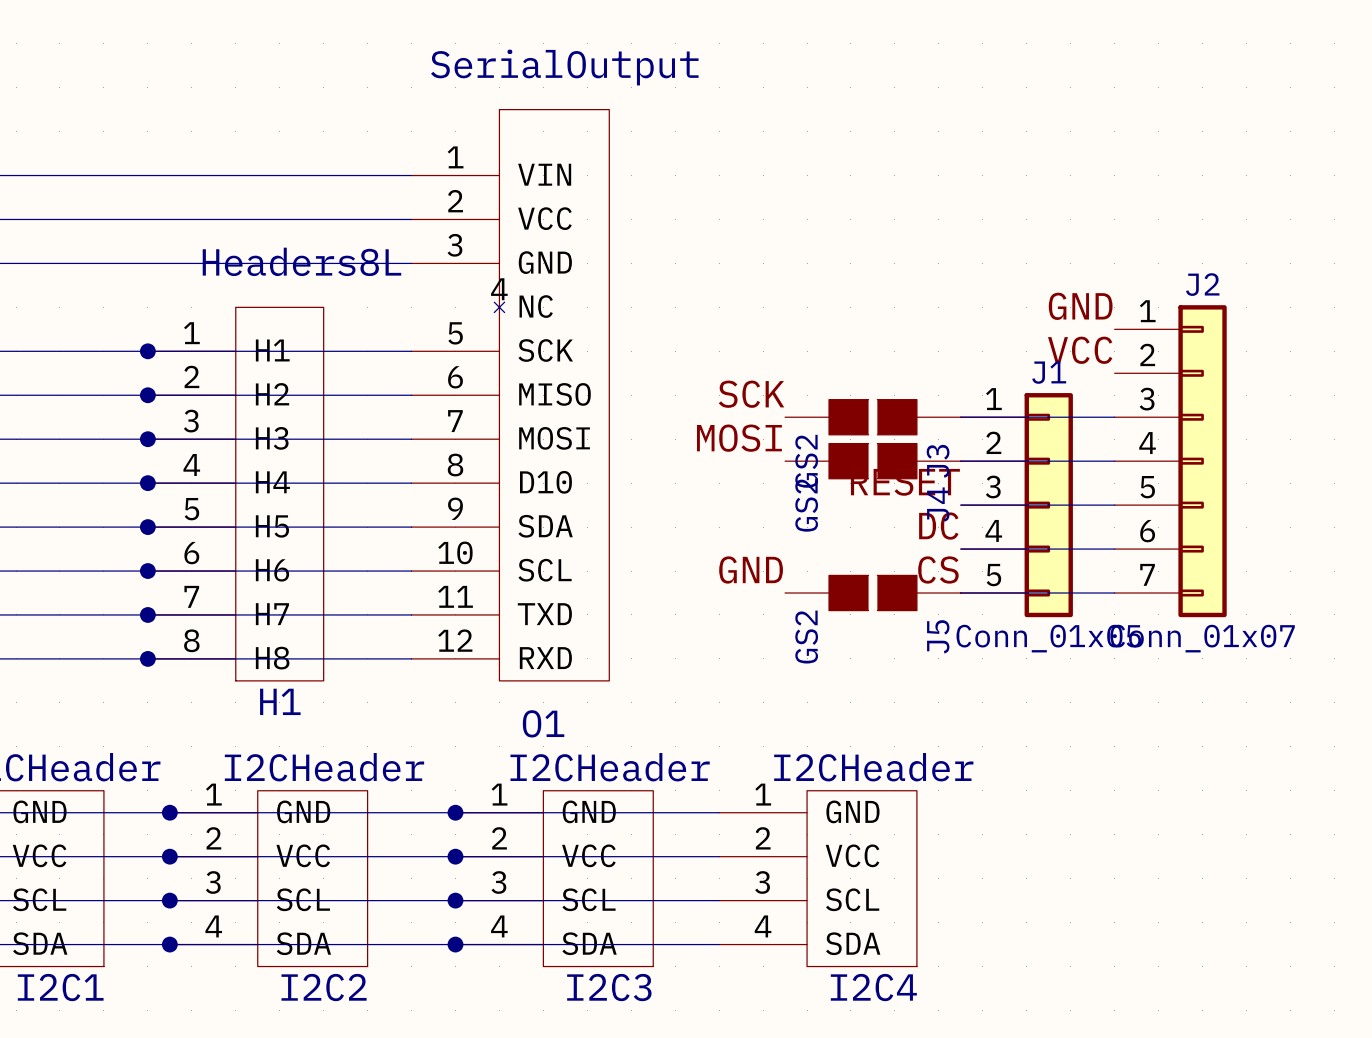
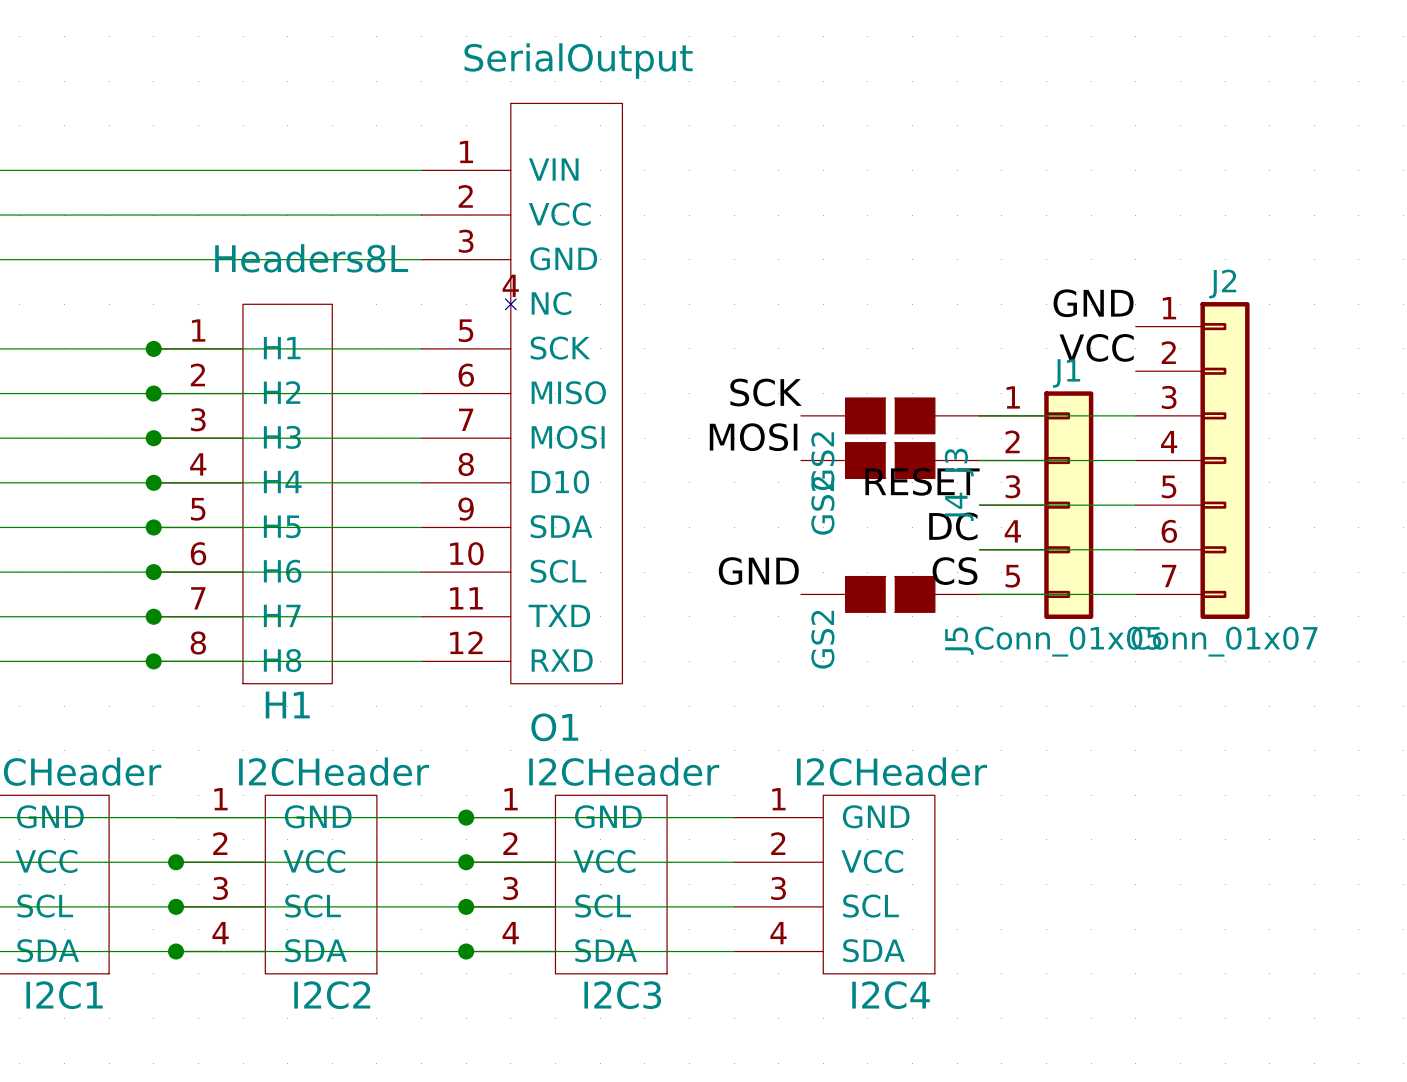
junction: (169, 812) -> none

